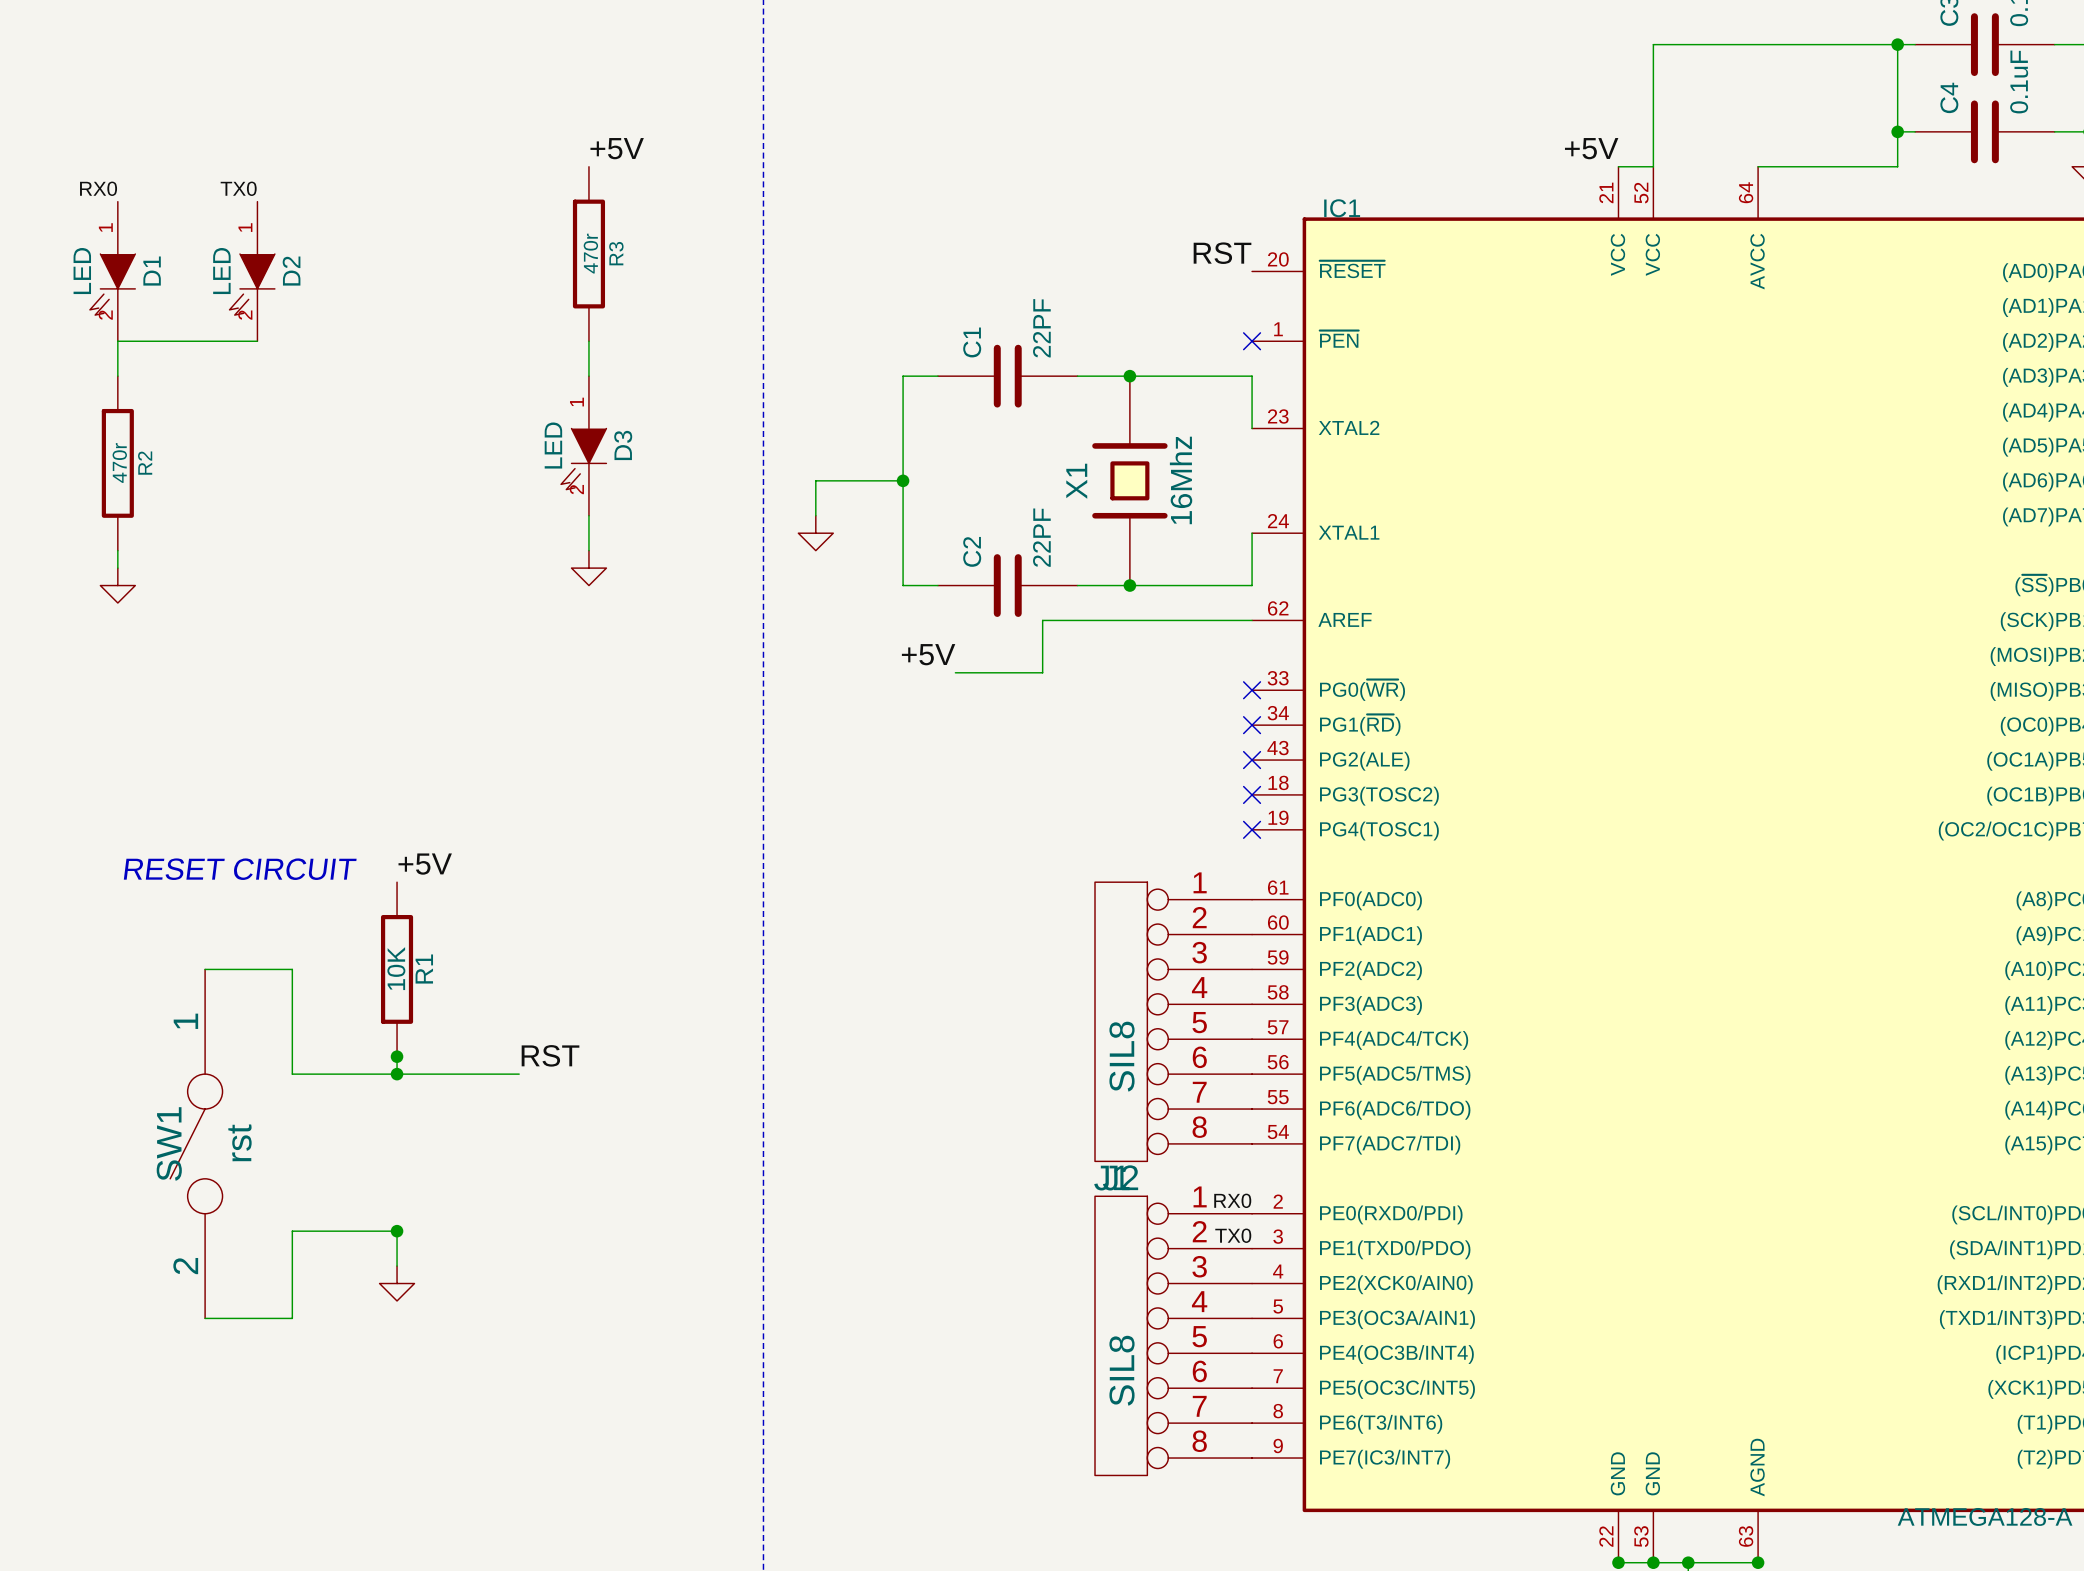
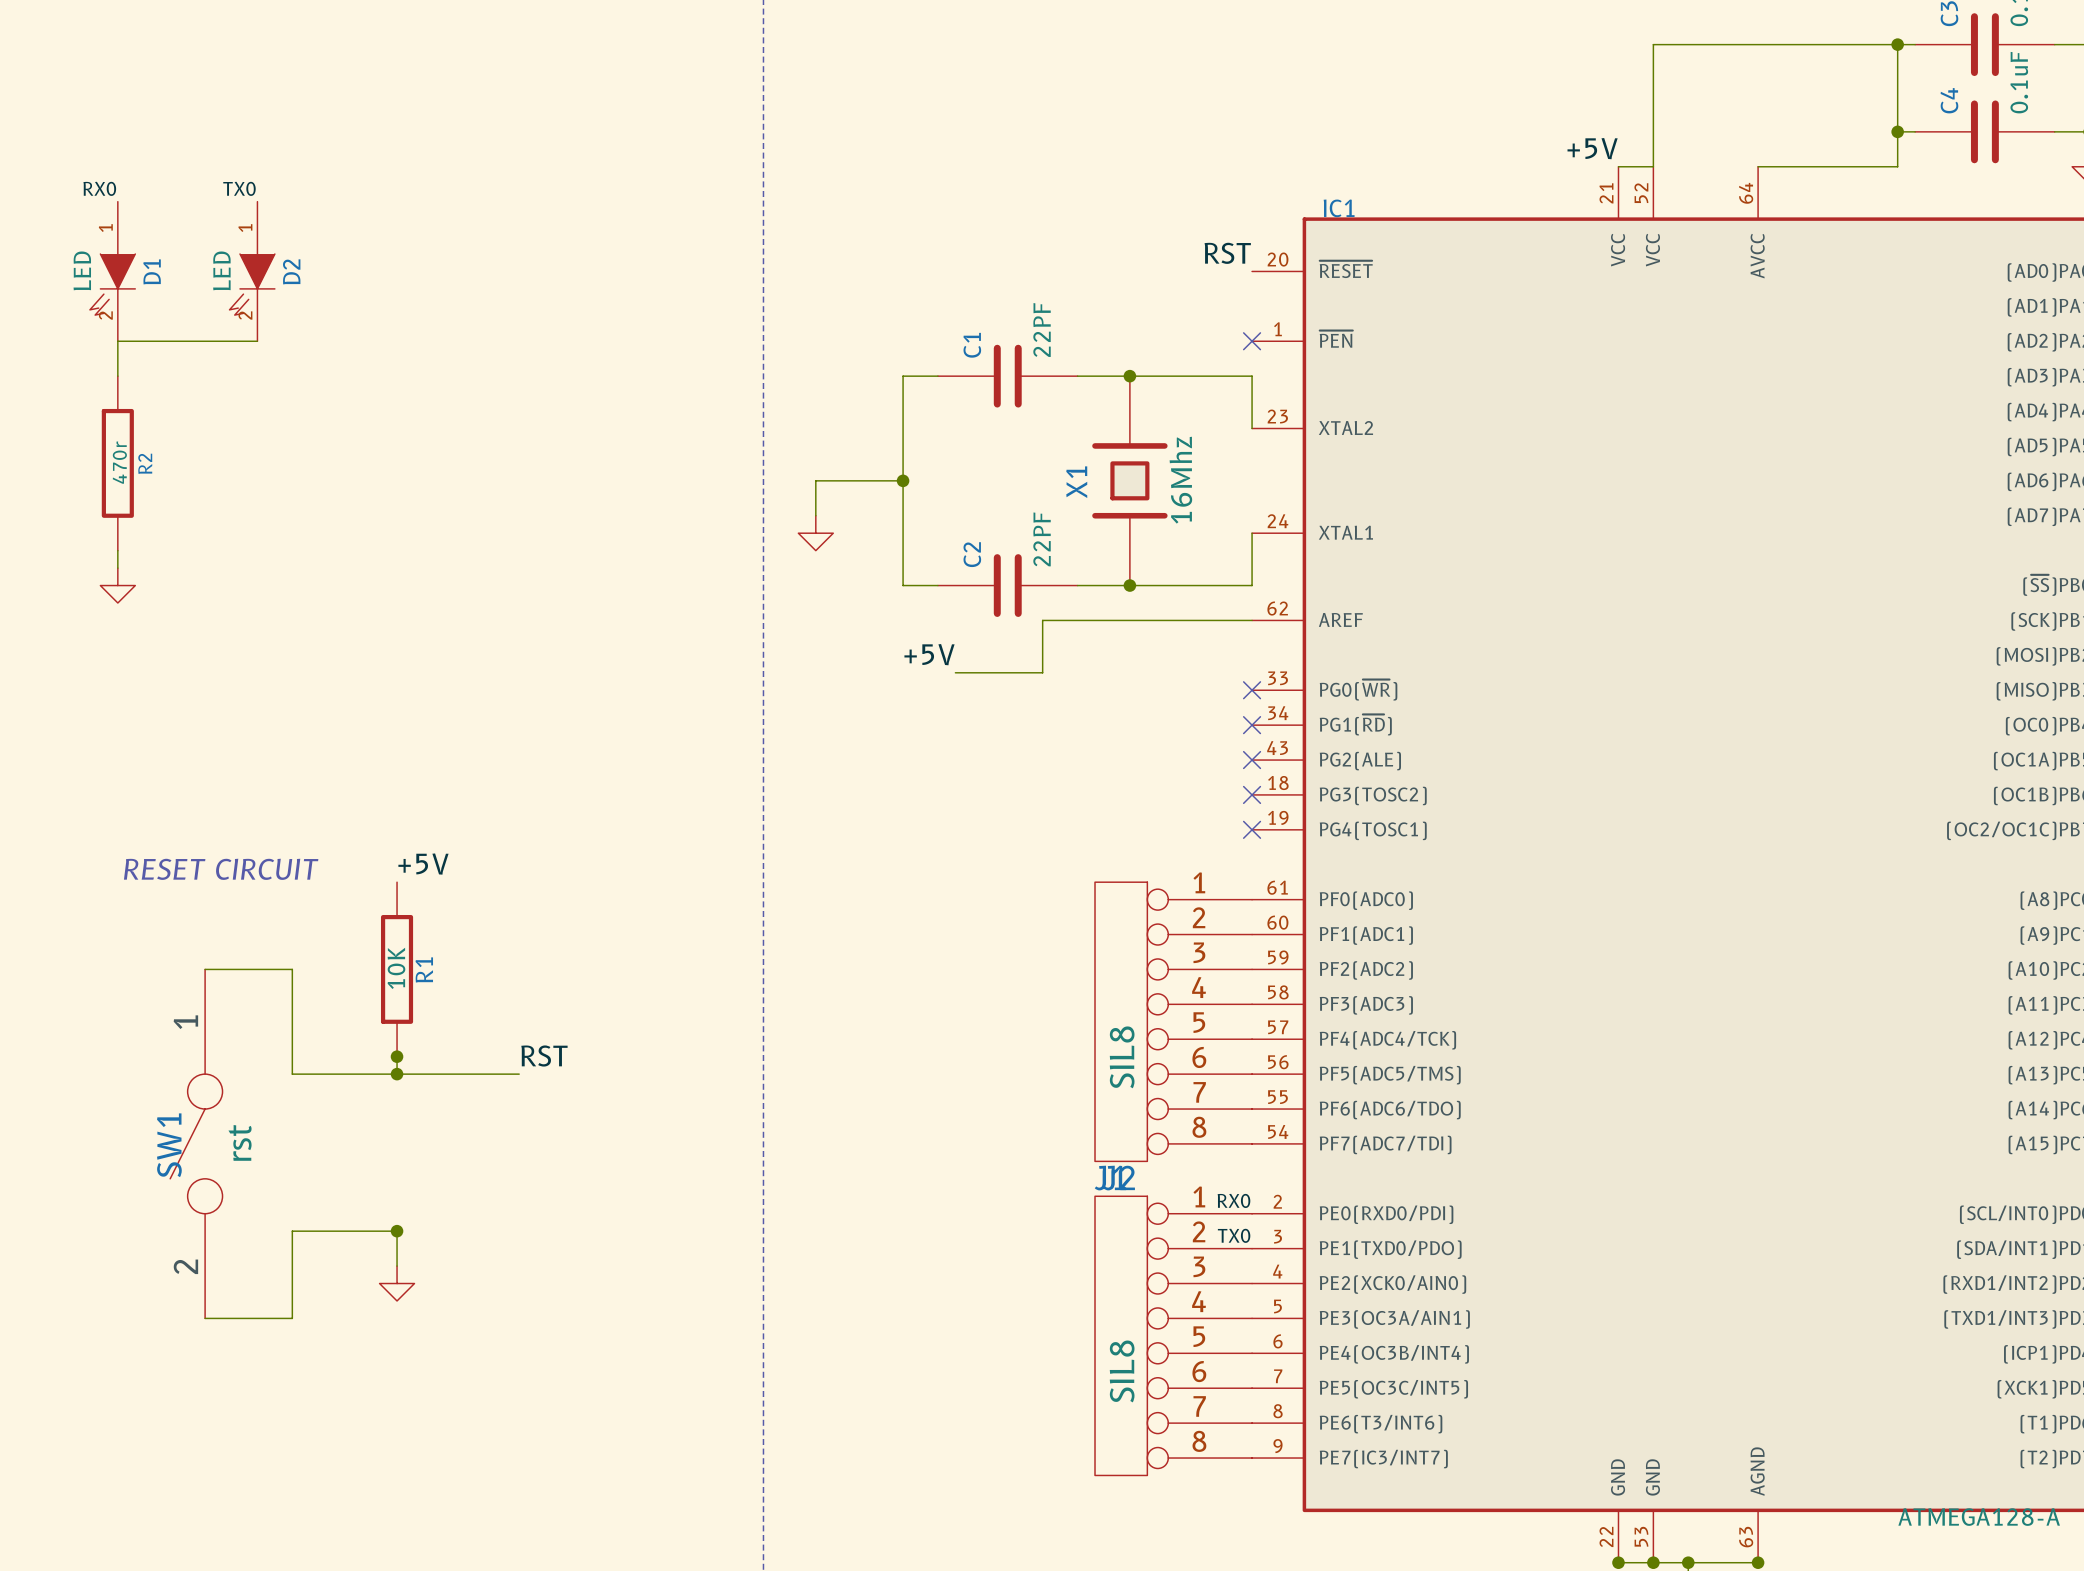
label: +5V (617, 148) -> none
R3: 470r (588, 254) -> none
wire: (588, 341) (588, 376) -> none
D3: LED (583, 445) -> none
wire: (588, 515) (588, 550) -> none
power symbol: (588, 568) -> none

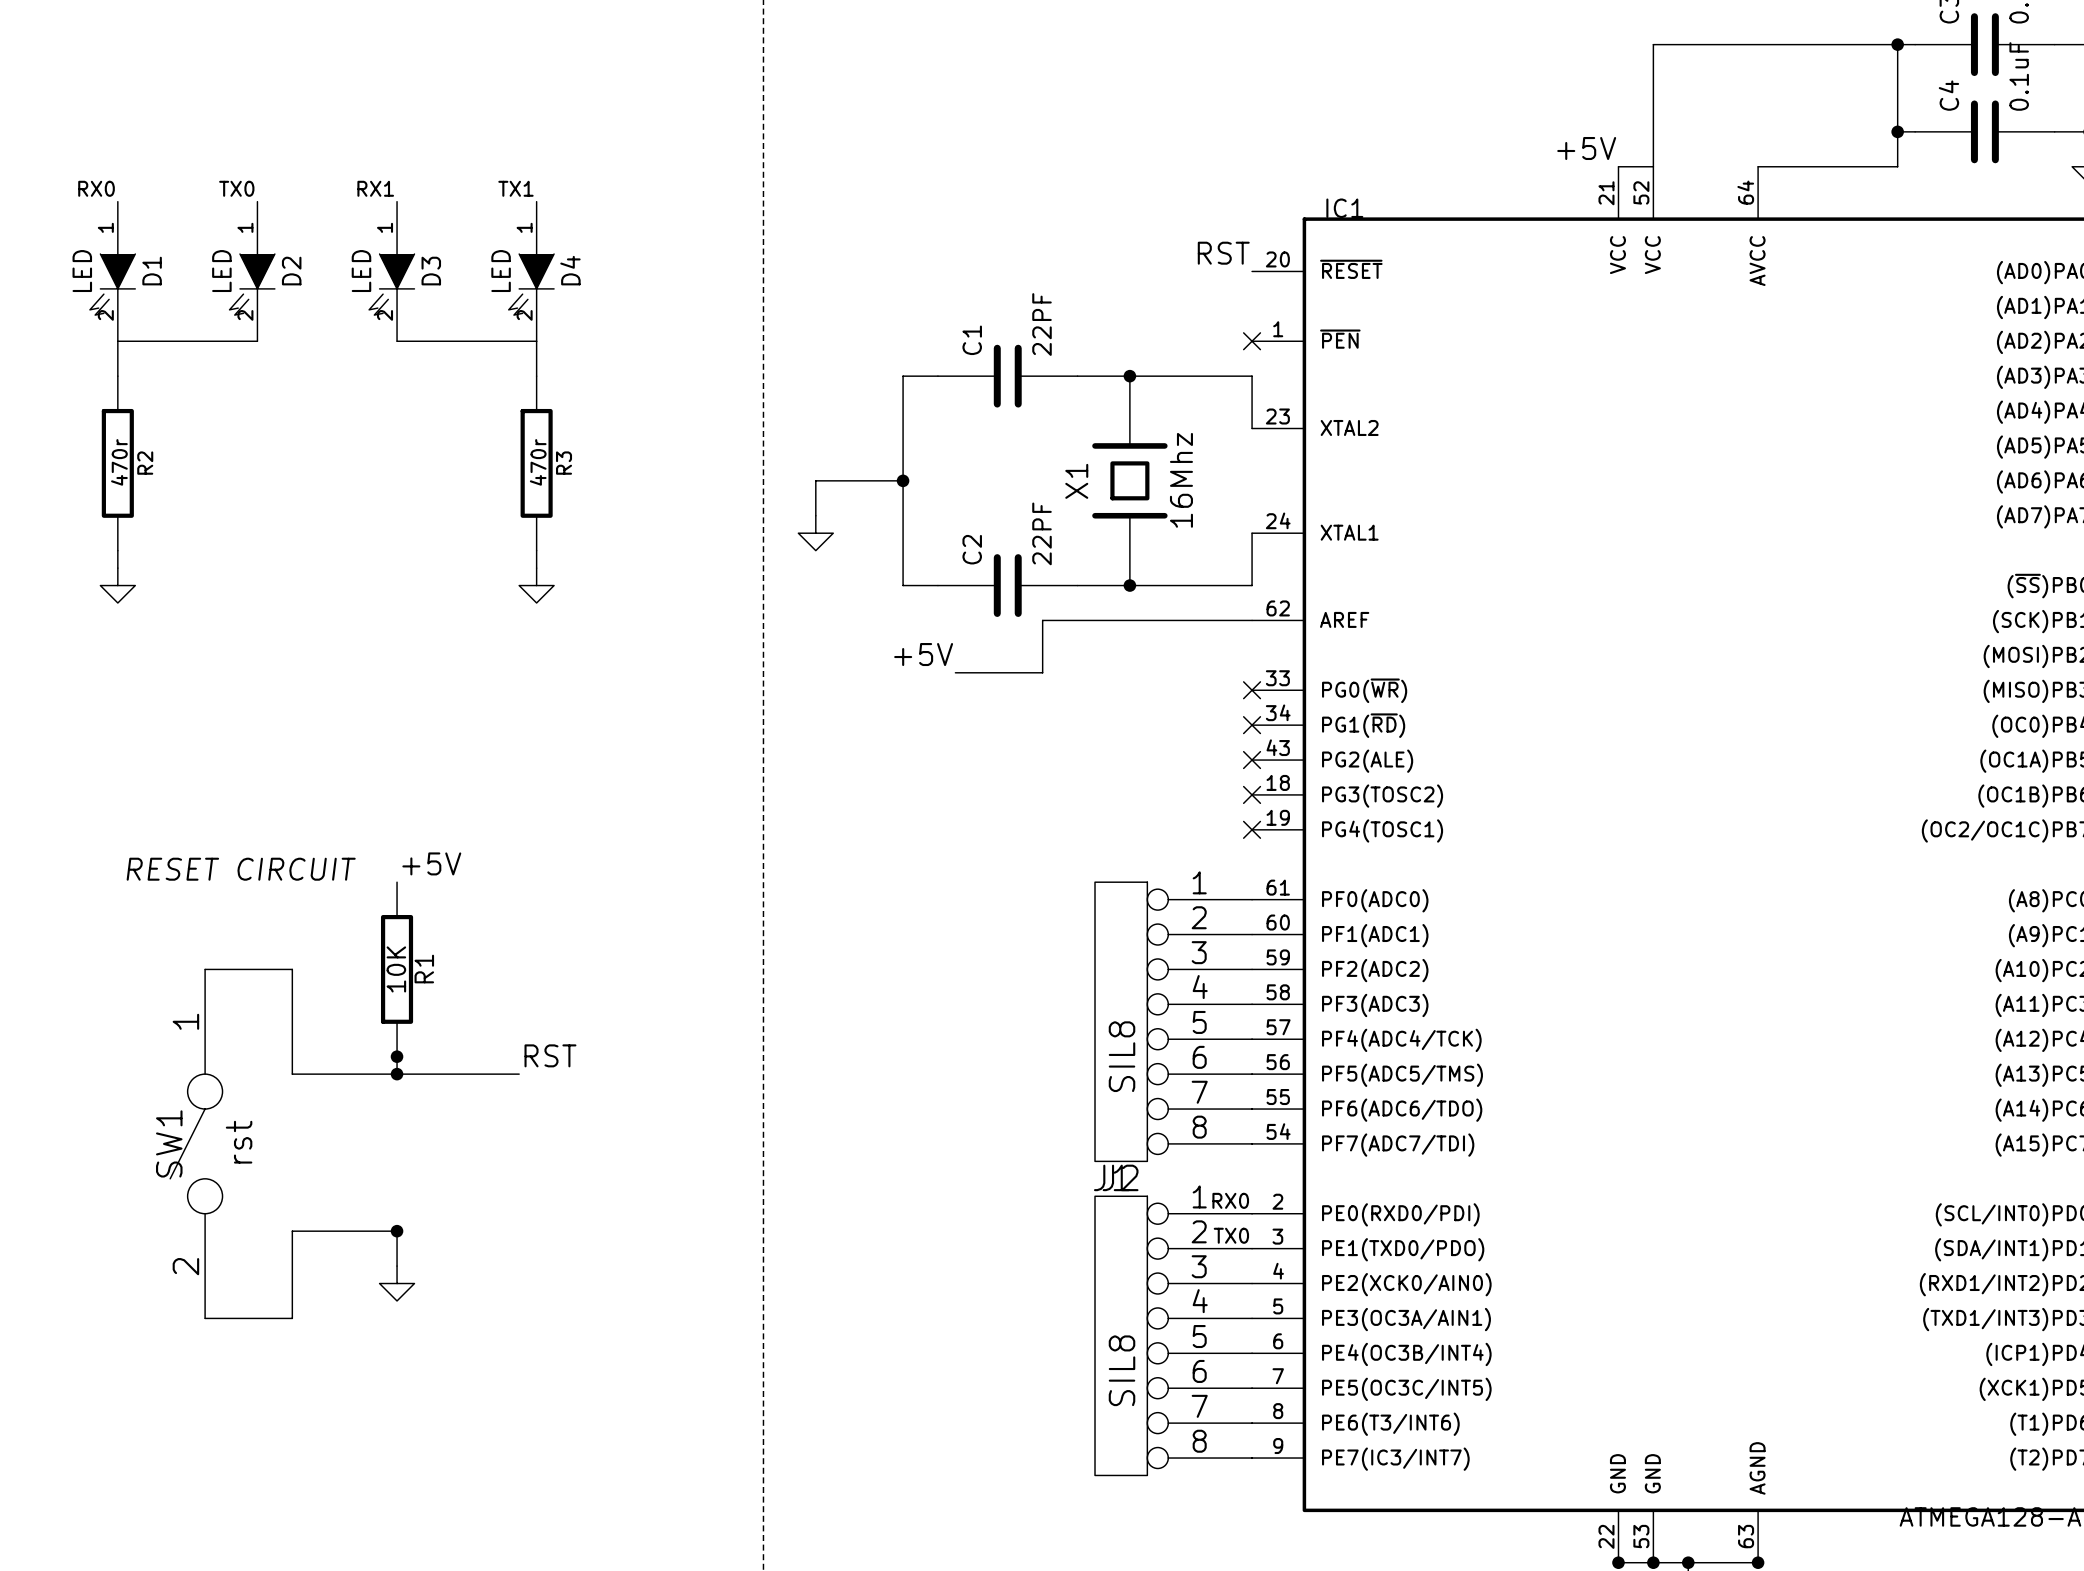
label: none -> RX1 (375, 188)
label: none -> TX1 (515, 188)
D3: none -> LED (391, 271)
D4: none -> LED (531, 271)
wire: none -> (397, 341) (536, 341) (536, 376)
R3: none -> 470r (536, 463)
wire: none -> (536, 550) (536, 568)
power symbol: none -> (536, 585)

